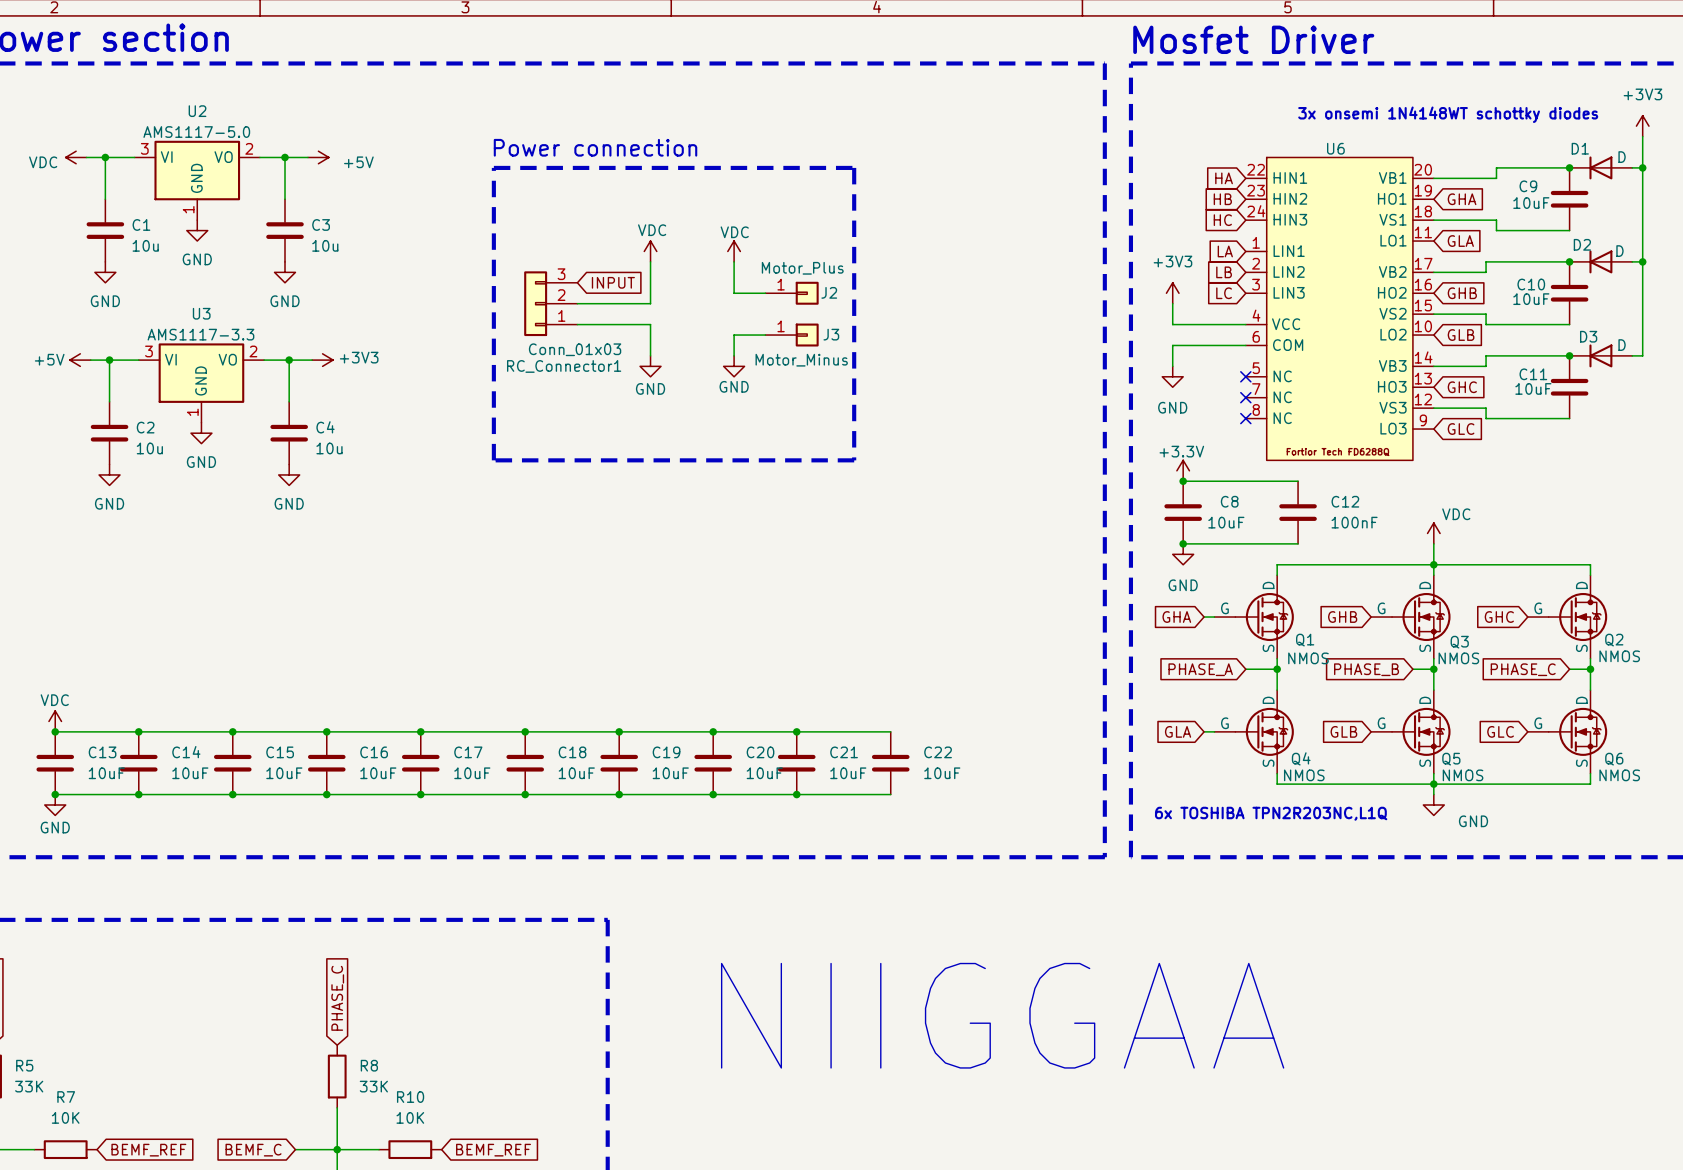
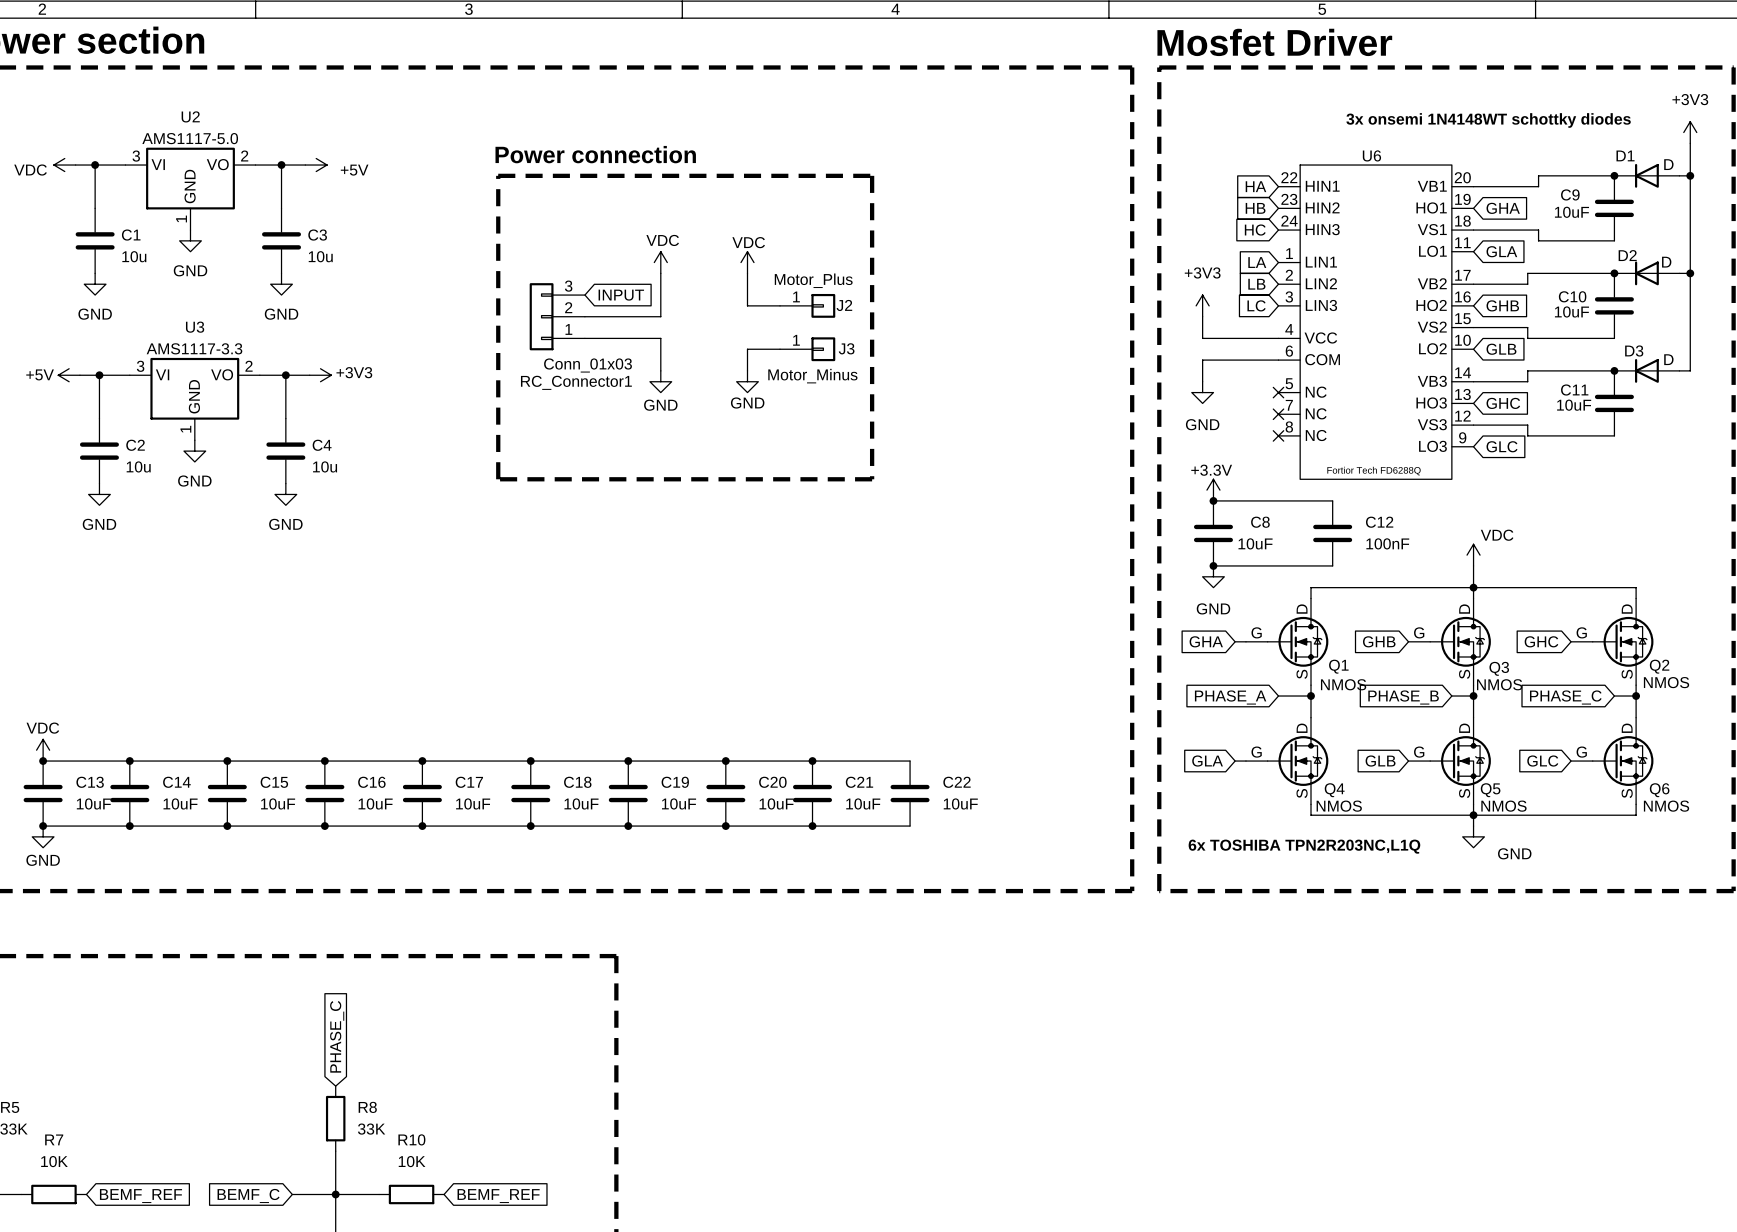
text: NIIGGAA (1002, 1015) -> none

